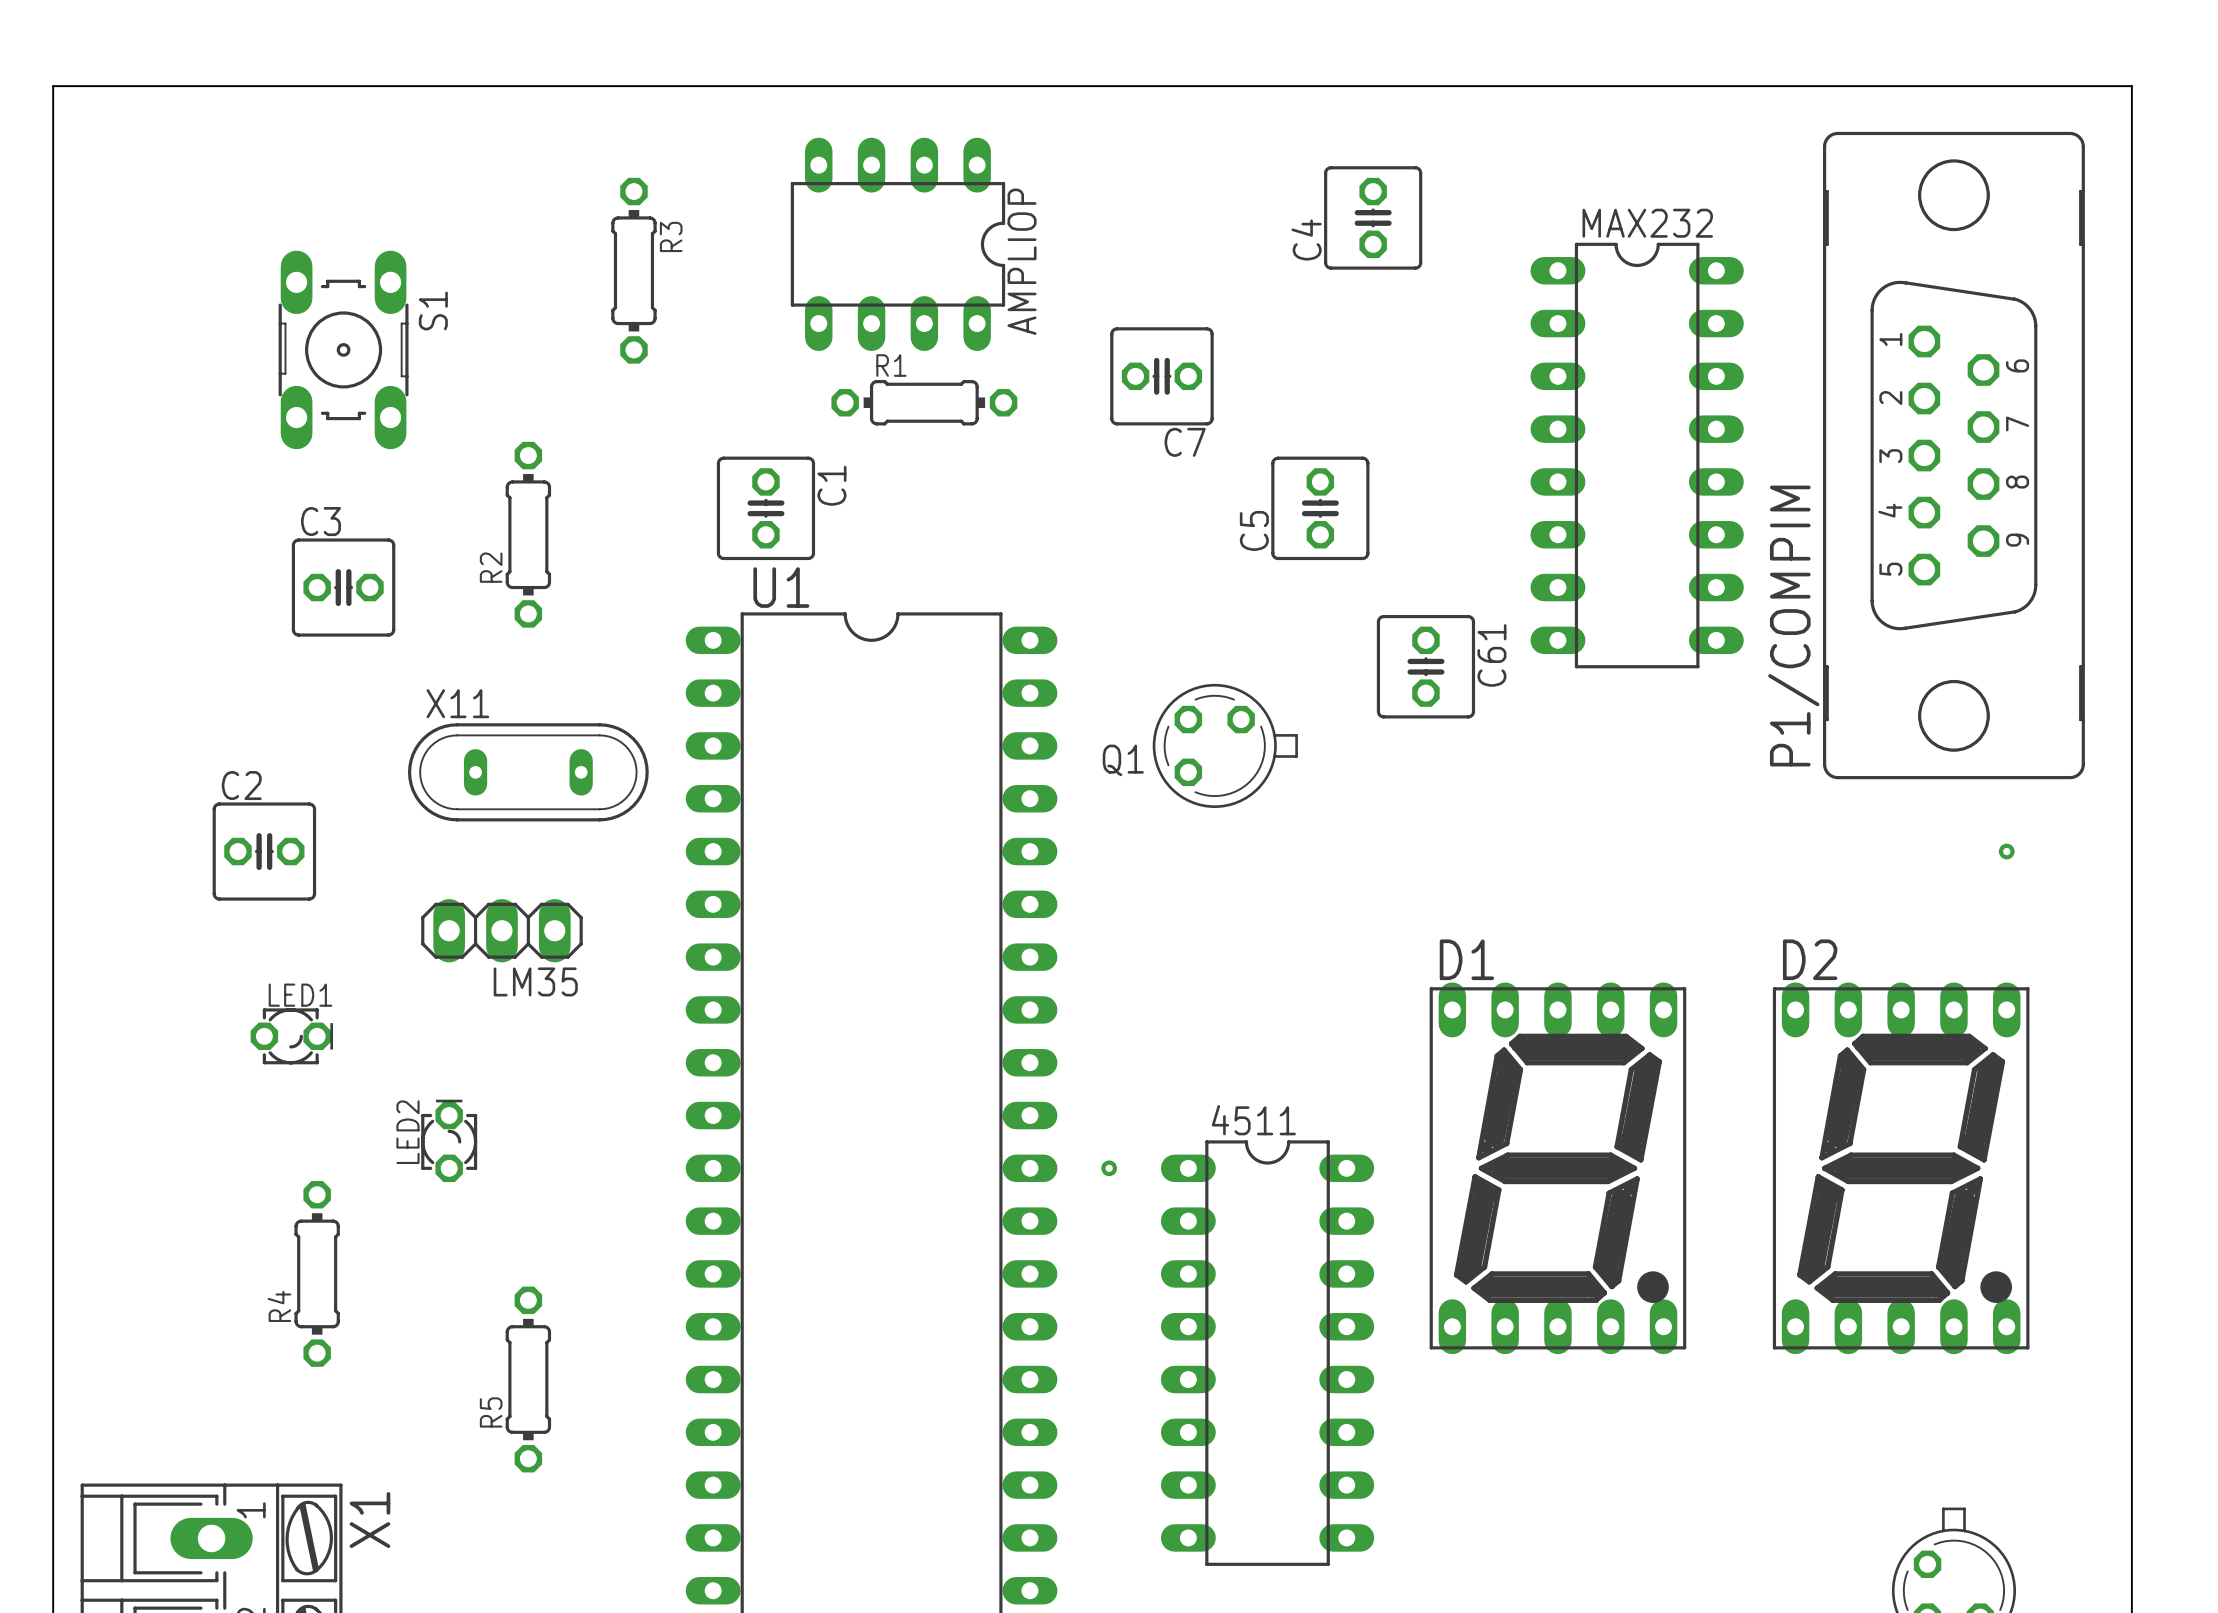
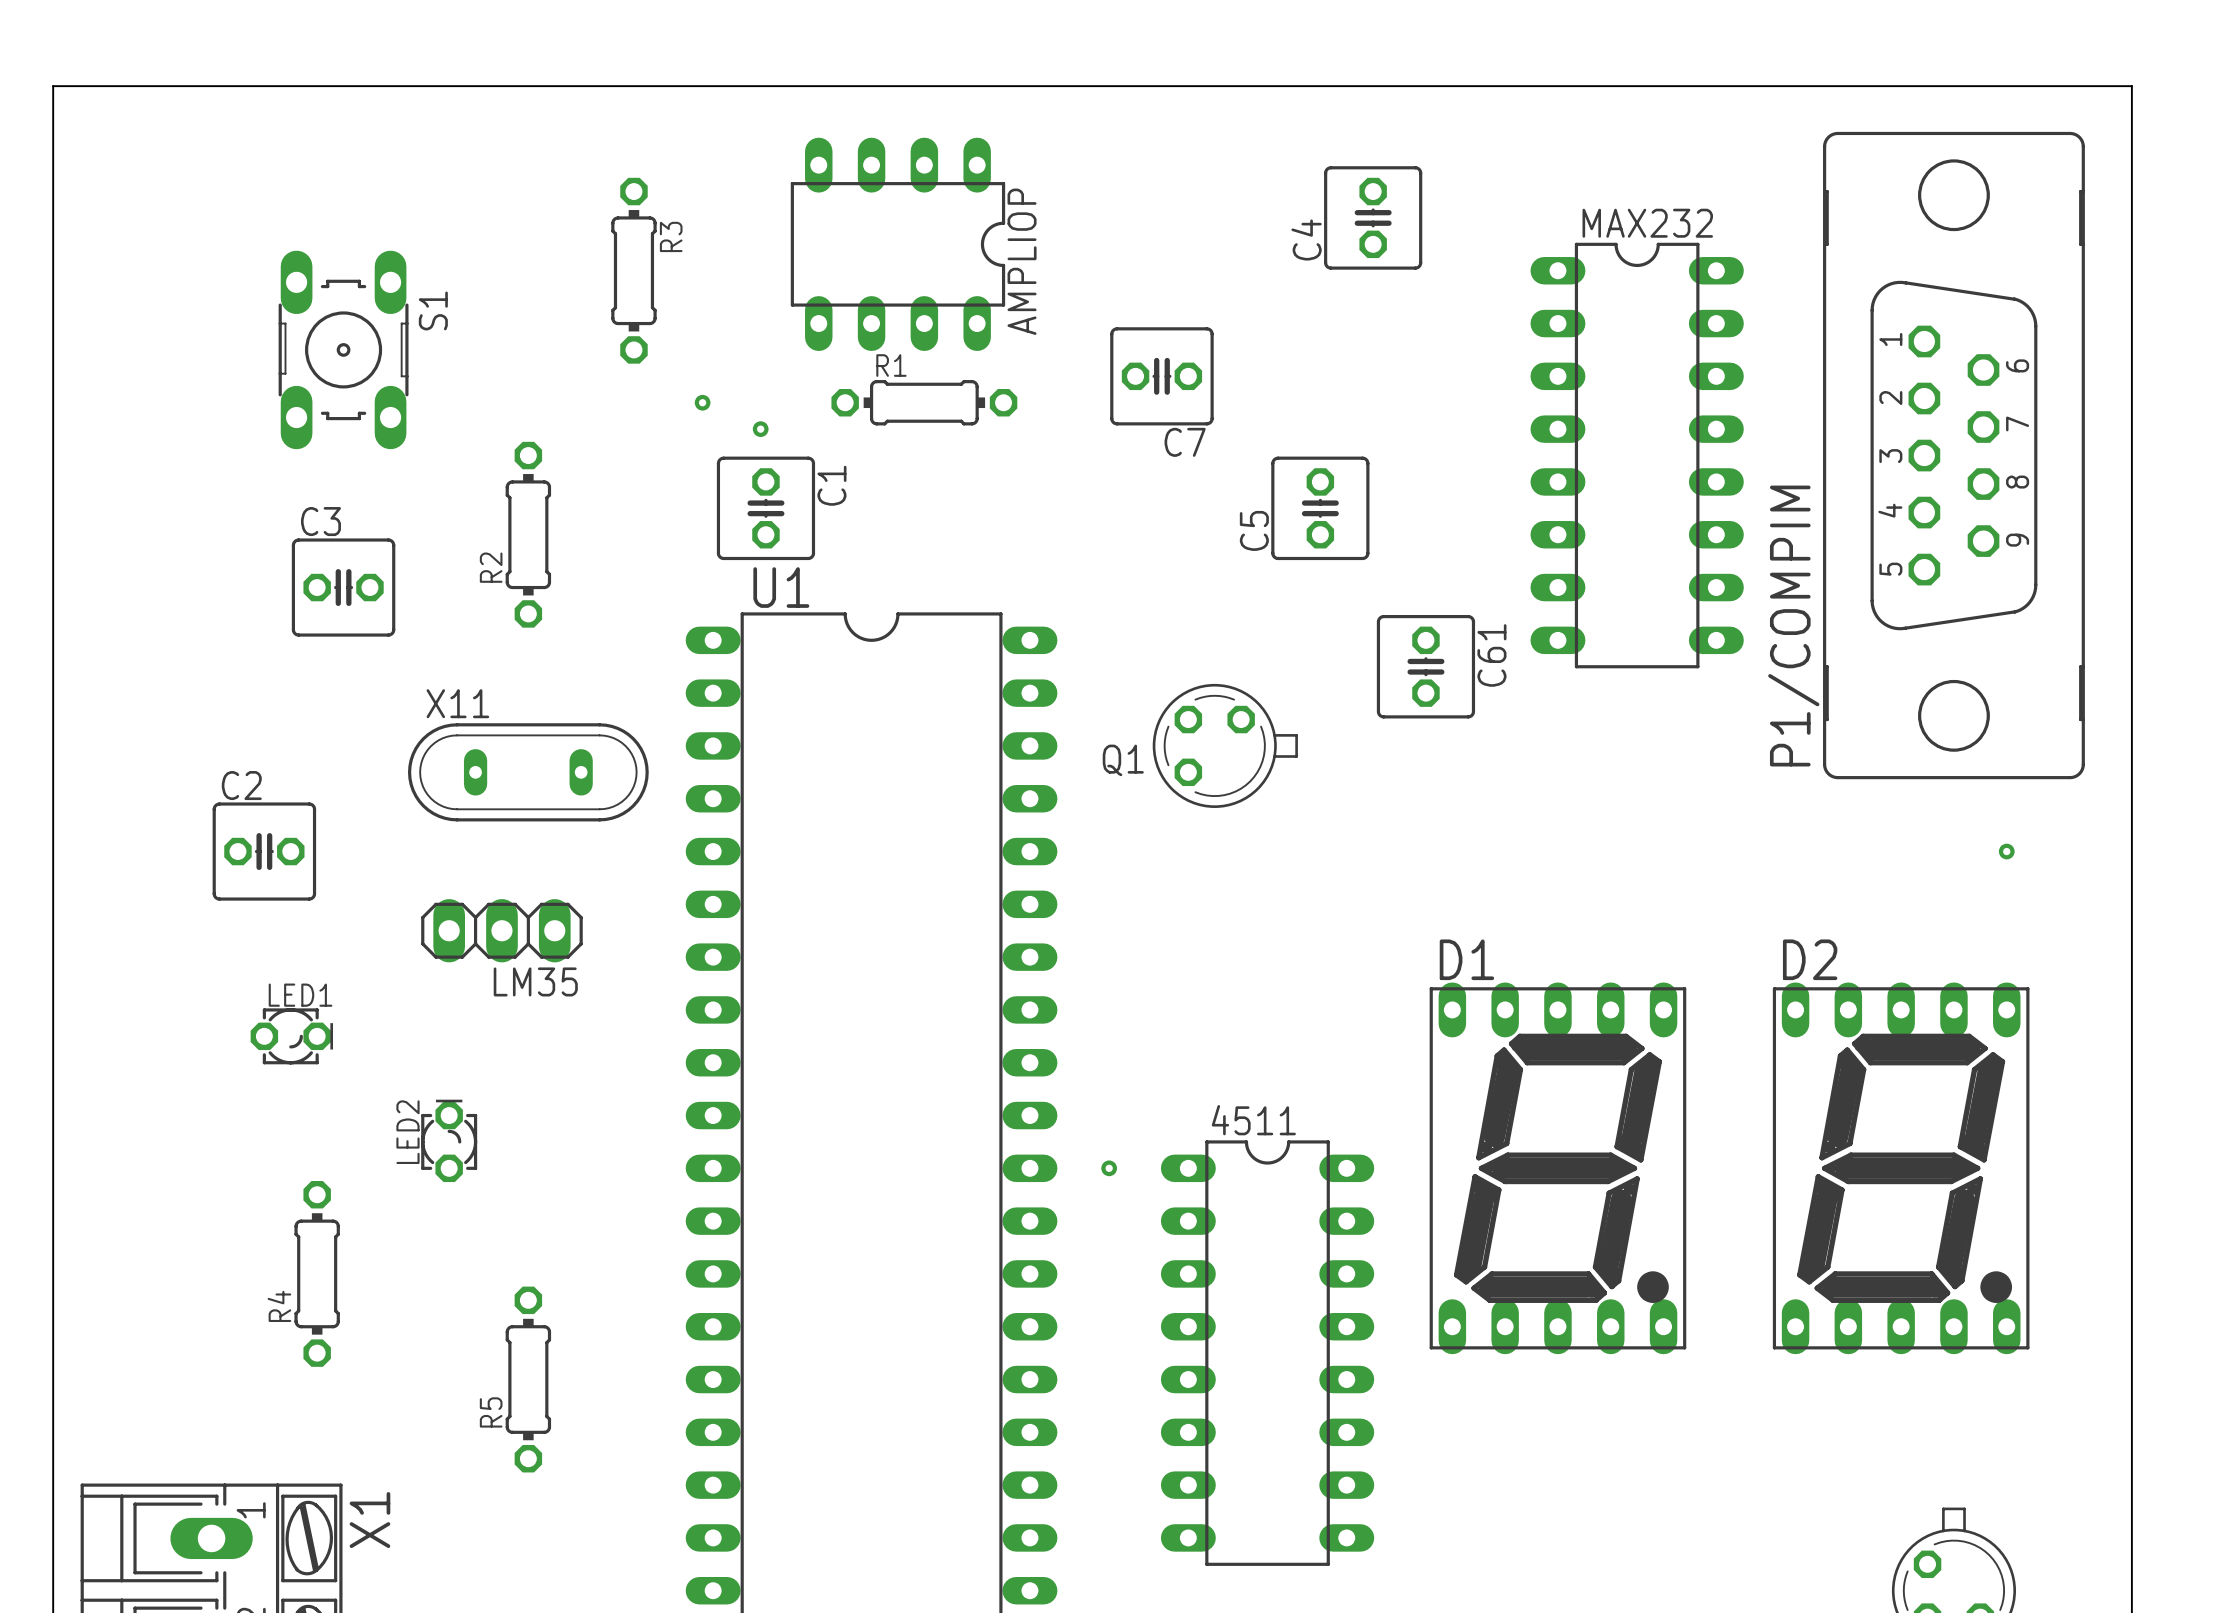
via: none -> (702, 402)
via: none -> (760, 429)

